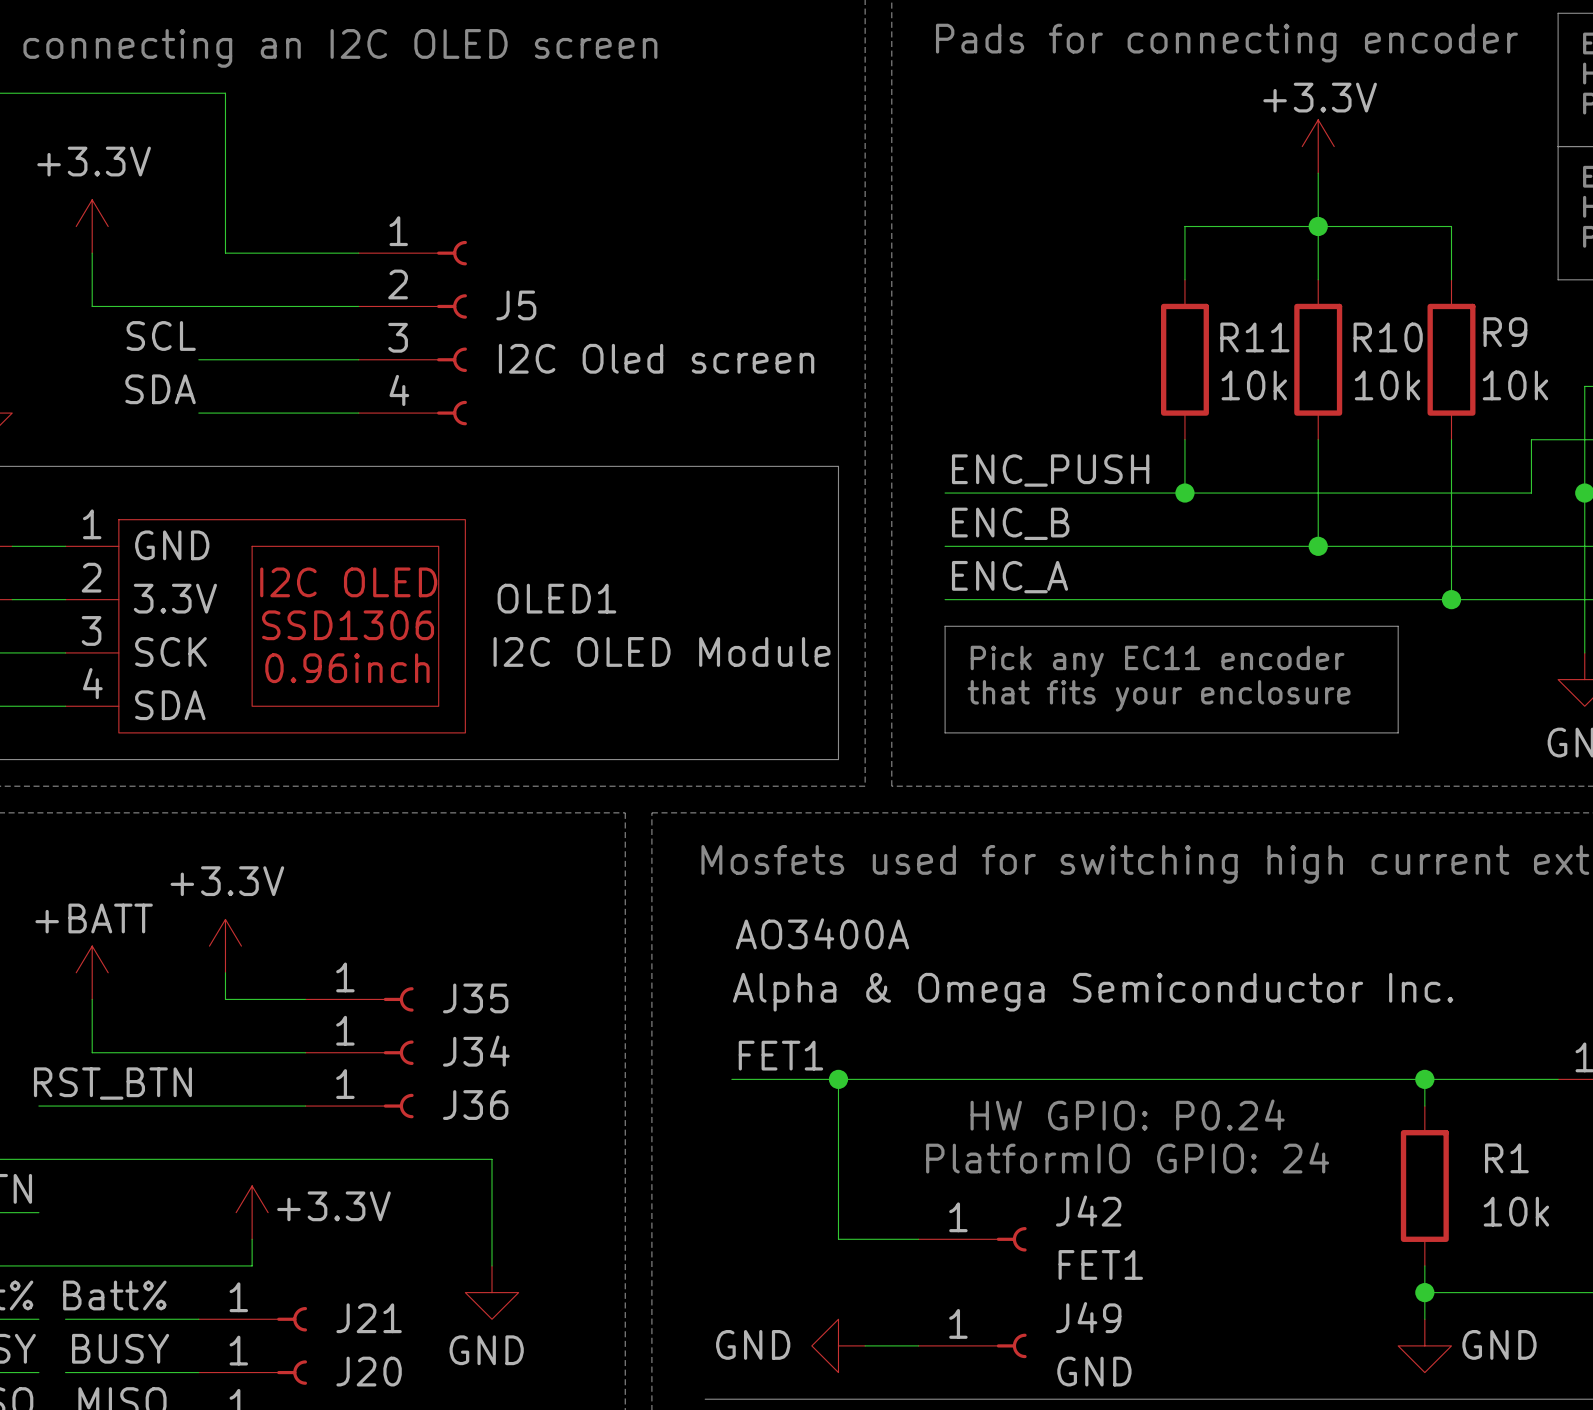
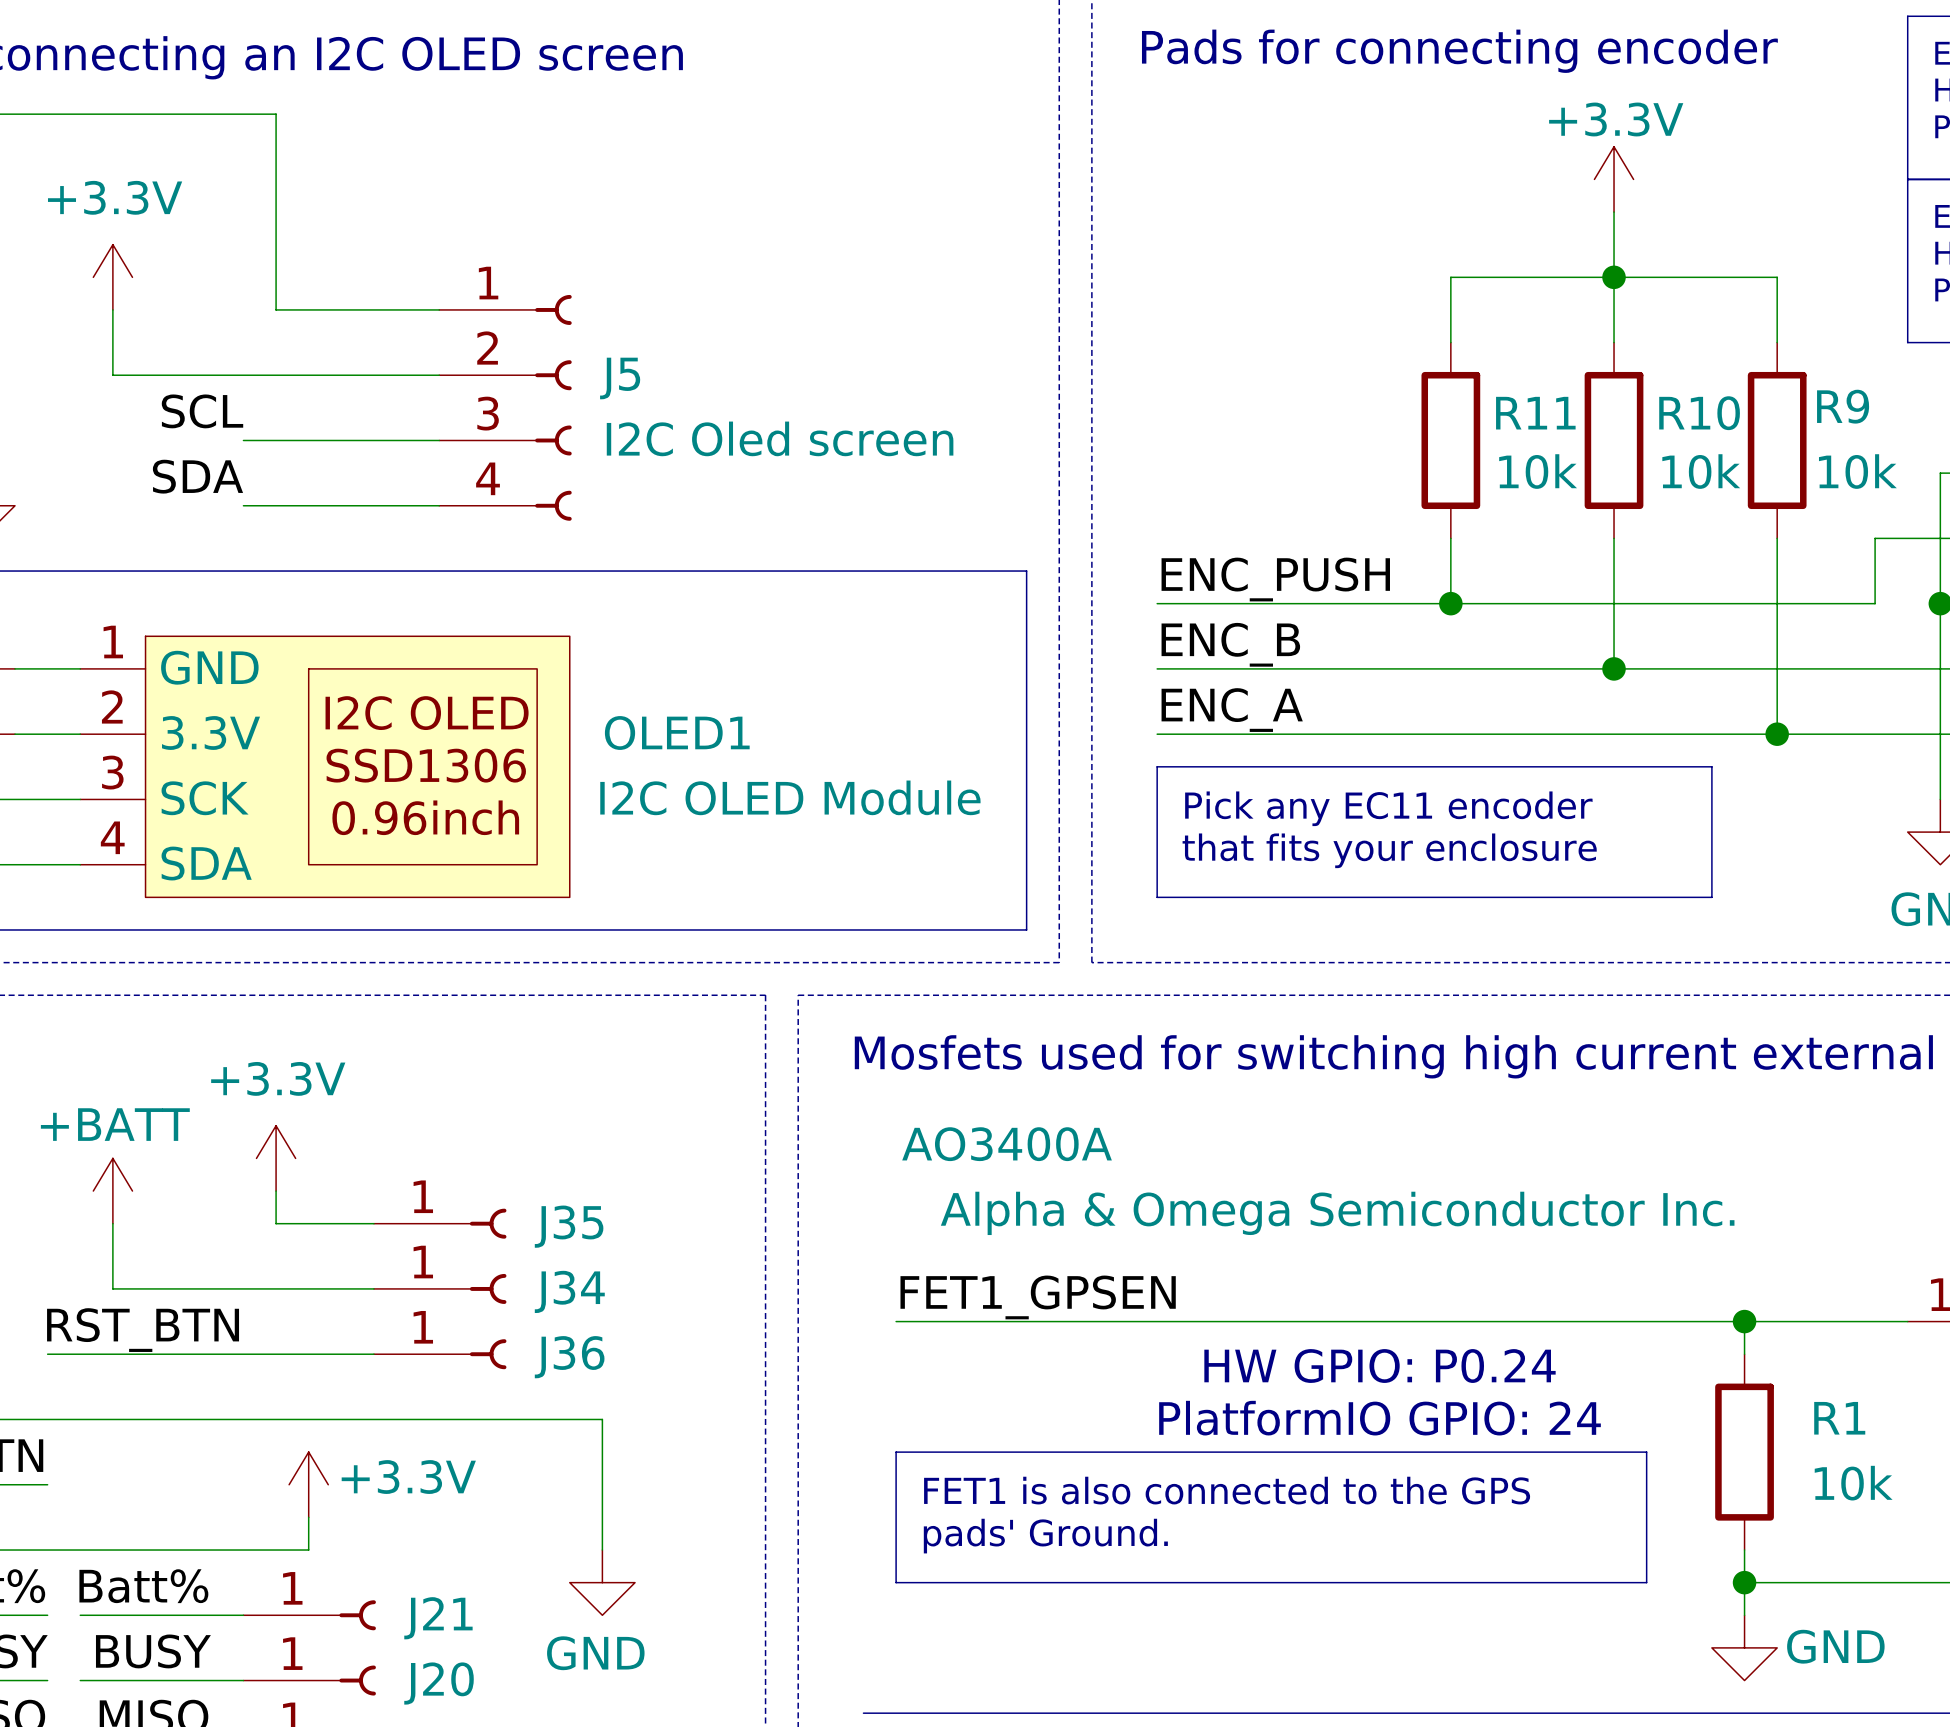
label: FET1 (780, 1055) -> FET1_GPSEN (1038, 1297)
wire: (838, 1079) (838, 1239) (918, 1239) -> none
junction: (838, 1079) -> none
line: none -> (896, 1452) (1646, 1452) (1646, 1582) (896, 1582) (896, 1452)
text: none -> FET1 is also connected to the GPS (1227, 1490)
J42: FET1 (972, 1239) -> none
text: none -> pads' Ground. (1045, 1536)
power symbol: GND (838, 1345) -> none
wire: (865, 1345) (918, 1345) -> none
J49: GND (972, 1345) -> none

